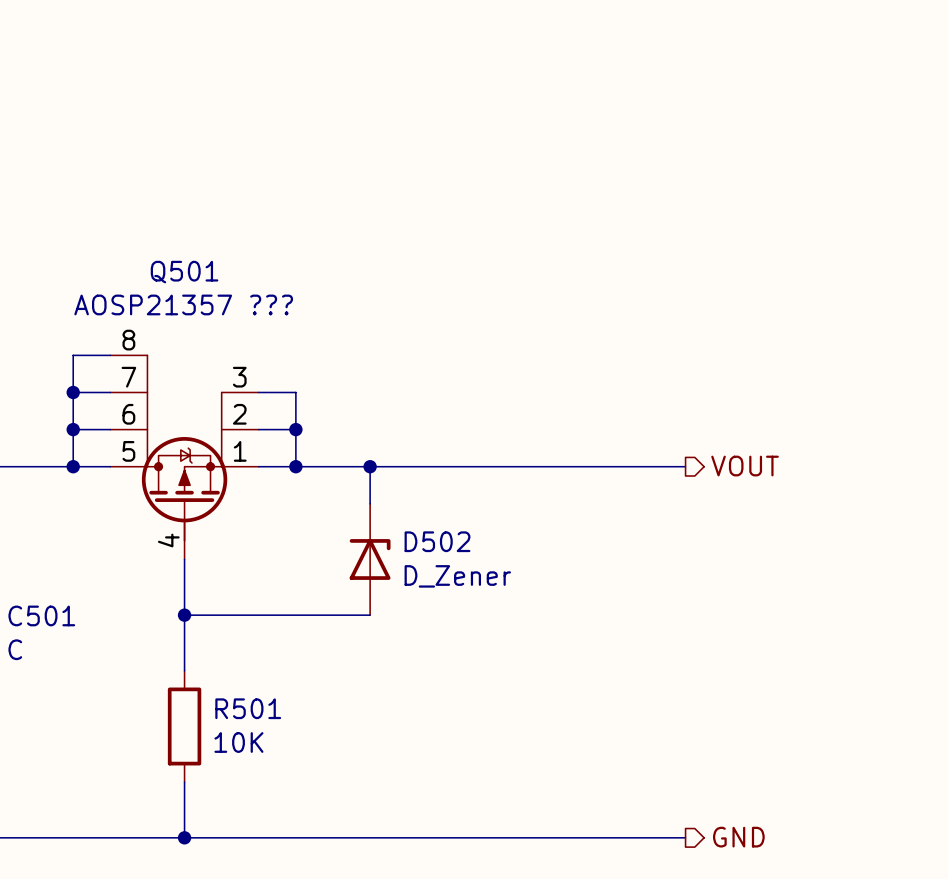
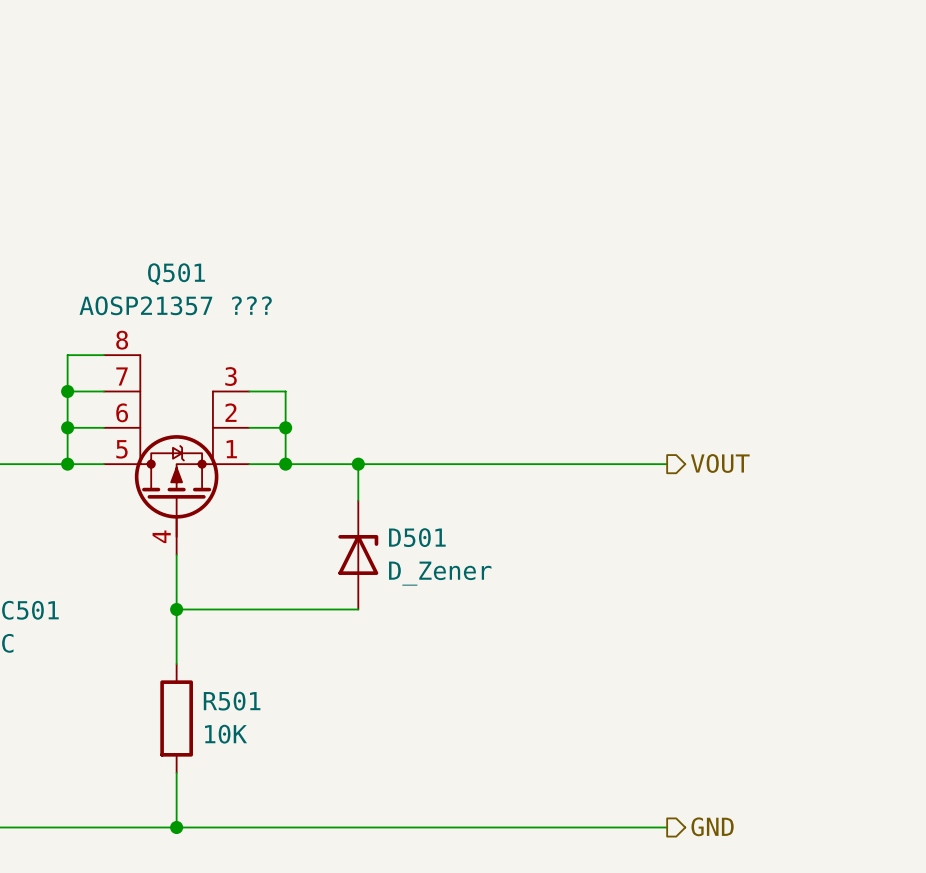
D502 name: D502 (437, 541) -> D501 (417, 537)

